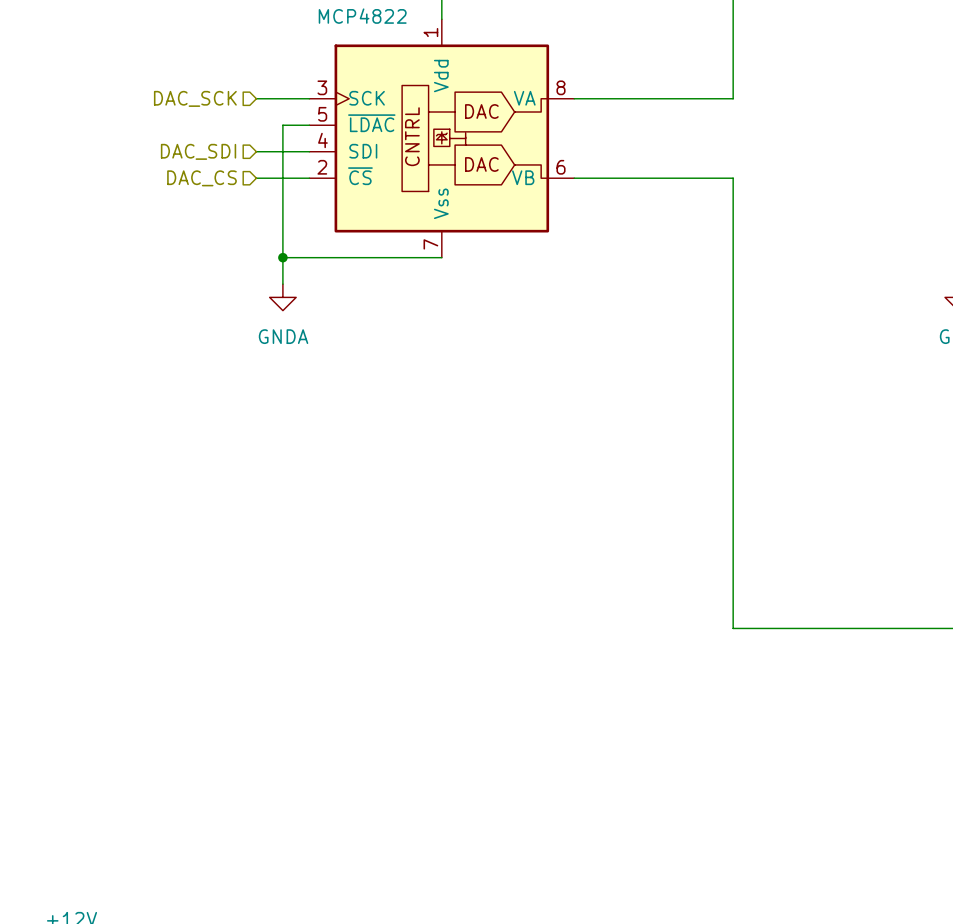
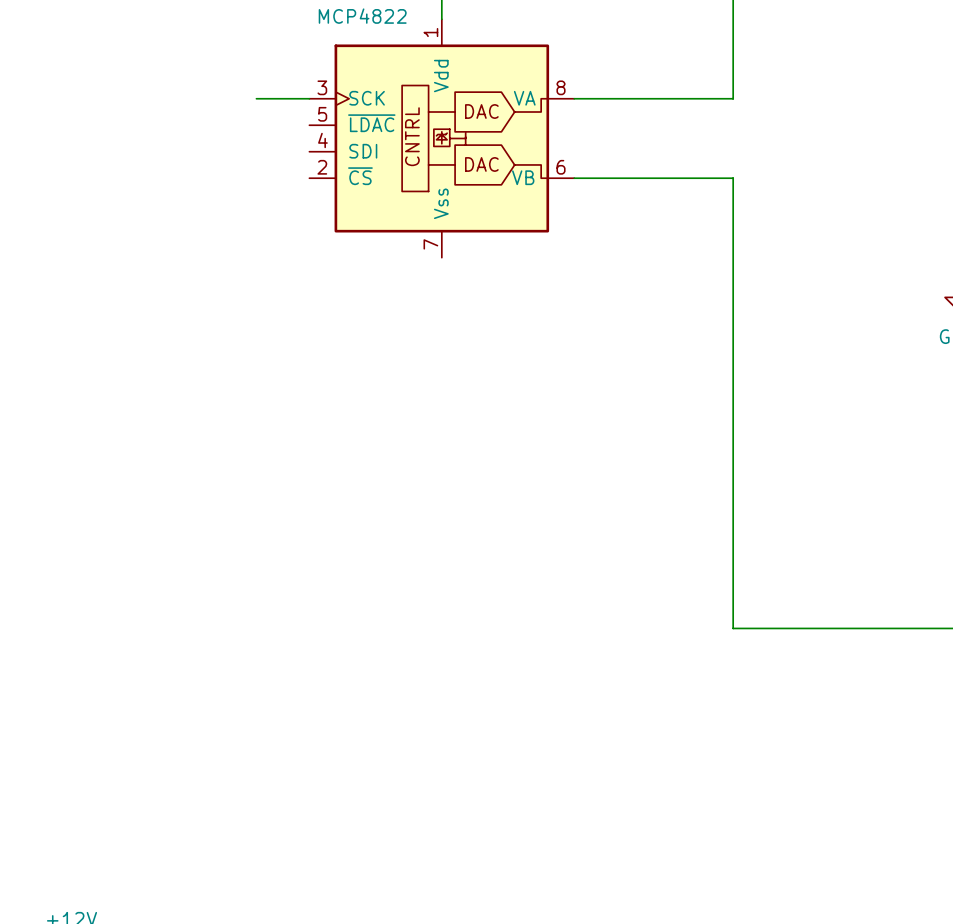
hierarchical label: DAC_SCK (195, 98) -> none
wire: (309, 125) (282, 125) (282, 284) -> none
hierarchical label: DAC_SDI (198, 151) -> none
wire: (256, 151) (309, 151) -> none
hierarchical label: DAC_CS (201, 178) -> none
wire: (256, 178) (309, 178) -> none
wire: (282, 257) (441, 257) -> none
junction: (282, 257) -> none
power symbol: GNDA (282, 297) -> none

